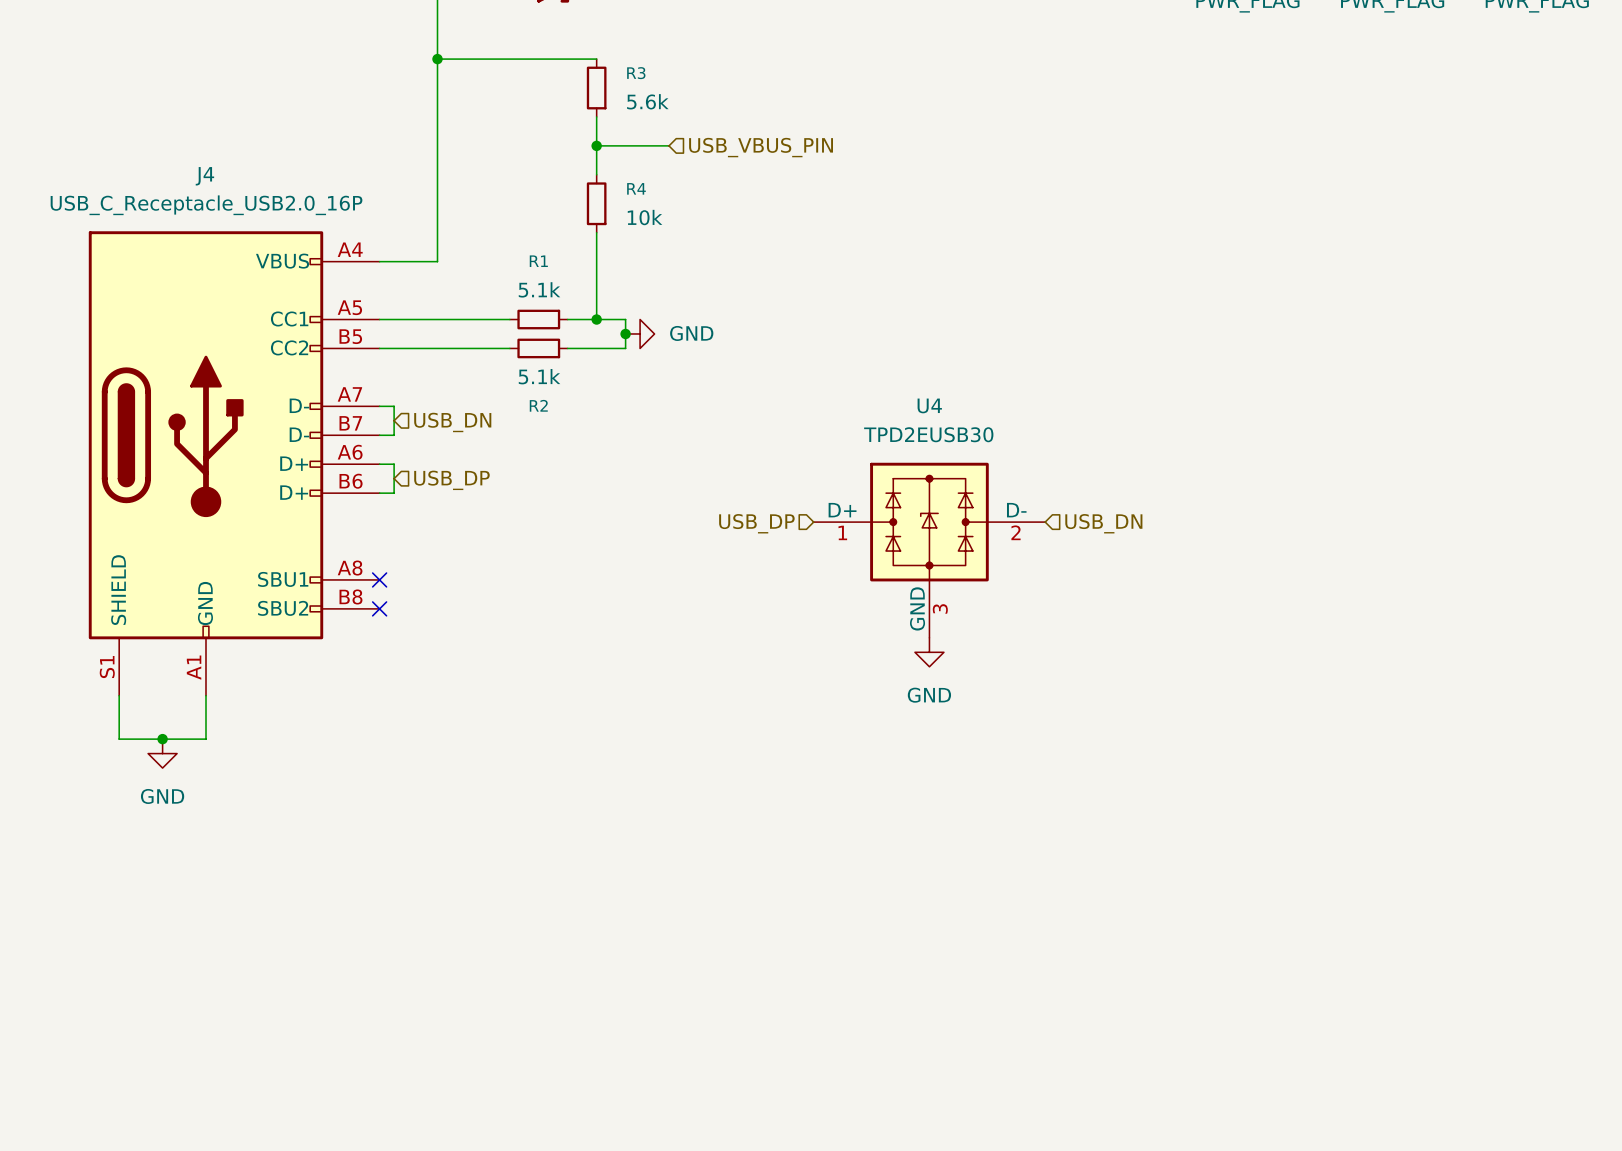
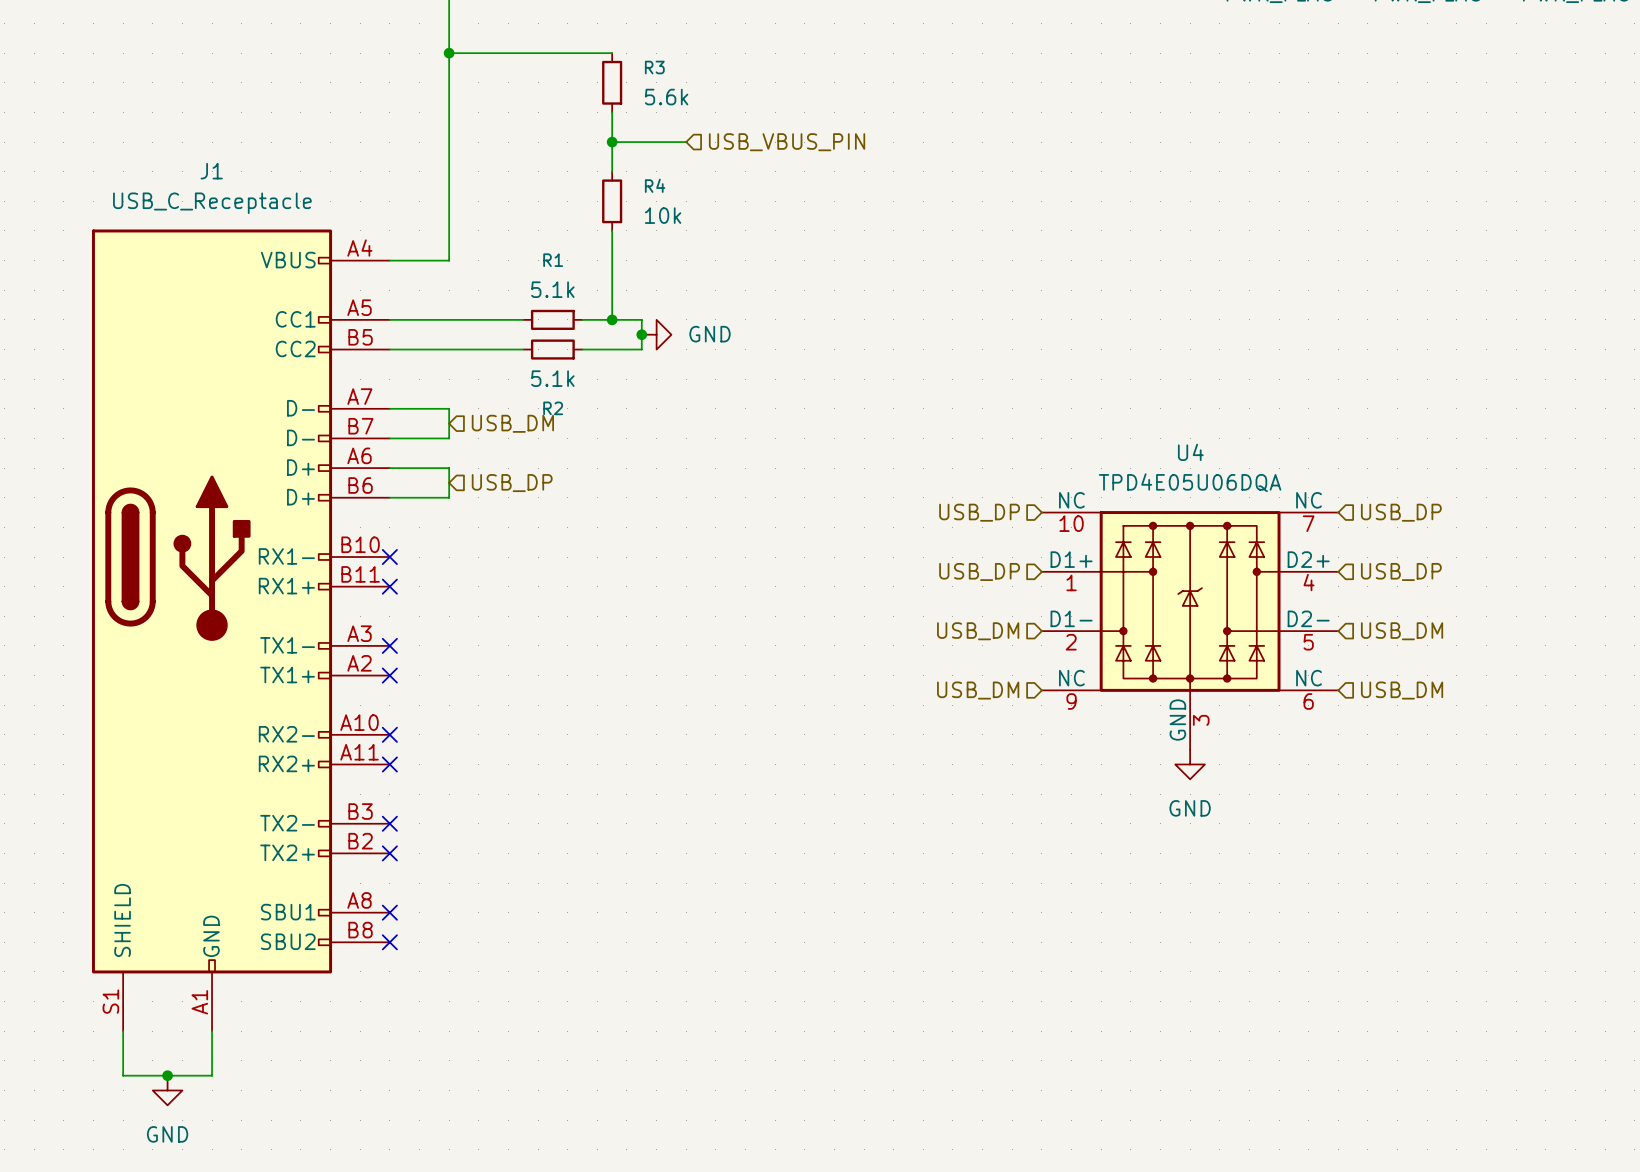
U4 name position: U4 (929, 405) -> U4 (1190, 452)
wire: (394, 406) (394, 435) -> (404, 408) (449, 408) (449, 438) (404, 438)
hierarchical label: USB_DN (452, 422) -> USB_DM (512, 423)
U4 value: TPD2EUSB30 (928, 434) -> TPD4E05U06DQA (1190, 482)
U4 symbol: [813, 462, 1046, 638] -> [1041, 511, 1339, 750]
J4: USB_C_Receptacle_USB2.0_16P (234, 463) -> none
wire: (394, 464) (394, 493) -> (404, 468) (449, 468) (449, 497) (404, 497)
hierarchical label position: USB_DP (451, 480) -> USB_DP (512, 483)
hierarchical label: none -> USB_DP (979, 512)
hierarchical label: none -> USB_DP (1401, 512)
hierarchical label: USB_DP (756, 523) -> none
hierarchical label: USB_DN (1103, 523) -> none
no-connect mark: none -> (389, 557)
hierarchical label: none -> USB_DP (979, 571)
hierarchical label: none -> USB_DP (1401, 571)
no-connect mark: (379, 608) -> none
J1: none -> USB_C_Receptacle (240, 630)
hierarchical label: none -> USB_DM (978, 631)
hierarchical label: none -> USB_DM (1402, 631)
no-connect mark: none -> (389, 645)
power symbol position: GND (929, 652) -> GND (1190, 764)
no-connect mark: none -> (389, 675)
hierarchical label: none -> USB_DM (978, 690)
hierarchical label: none -> USB_DM (1402, 690)
no-connect mark: none -> (389, 734)
junction: (162, 739) -> none
power symbol: GND (162, 753) -> none
no-connect mark: none -> (389, 764)
no-connect mark: none -> (389, 823)
no-connect mark: none -> (389, 853)
no-connect mark: none -> (389, 912)
no-connect mark: none -> (389, 942)
wire: none -> (123, 1031) (123, 1075) (212, 1075) (212, 1031)
junction: none -> (167, 1075)
power symbol: none -> GND (167, 1090)

